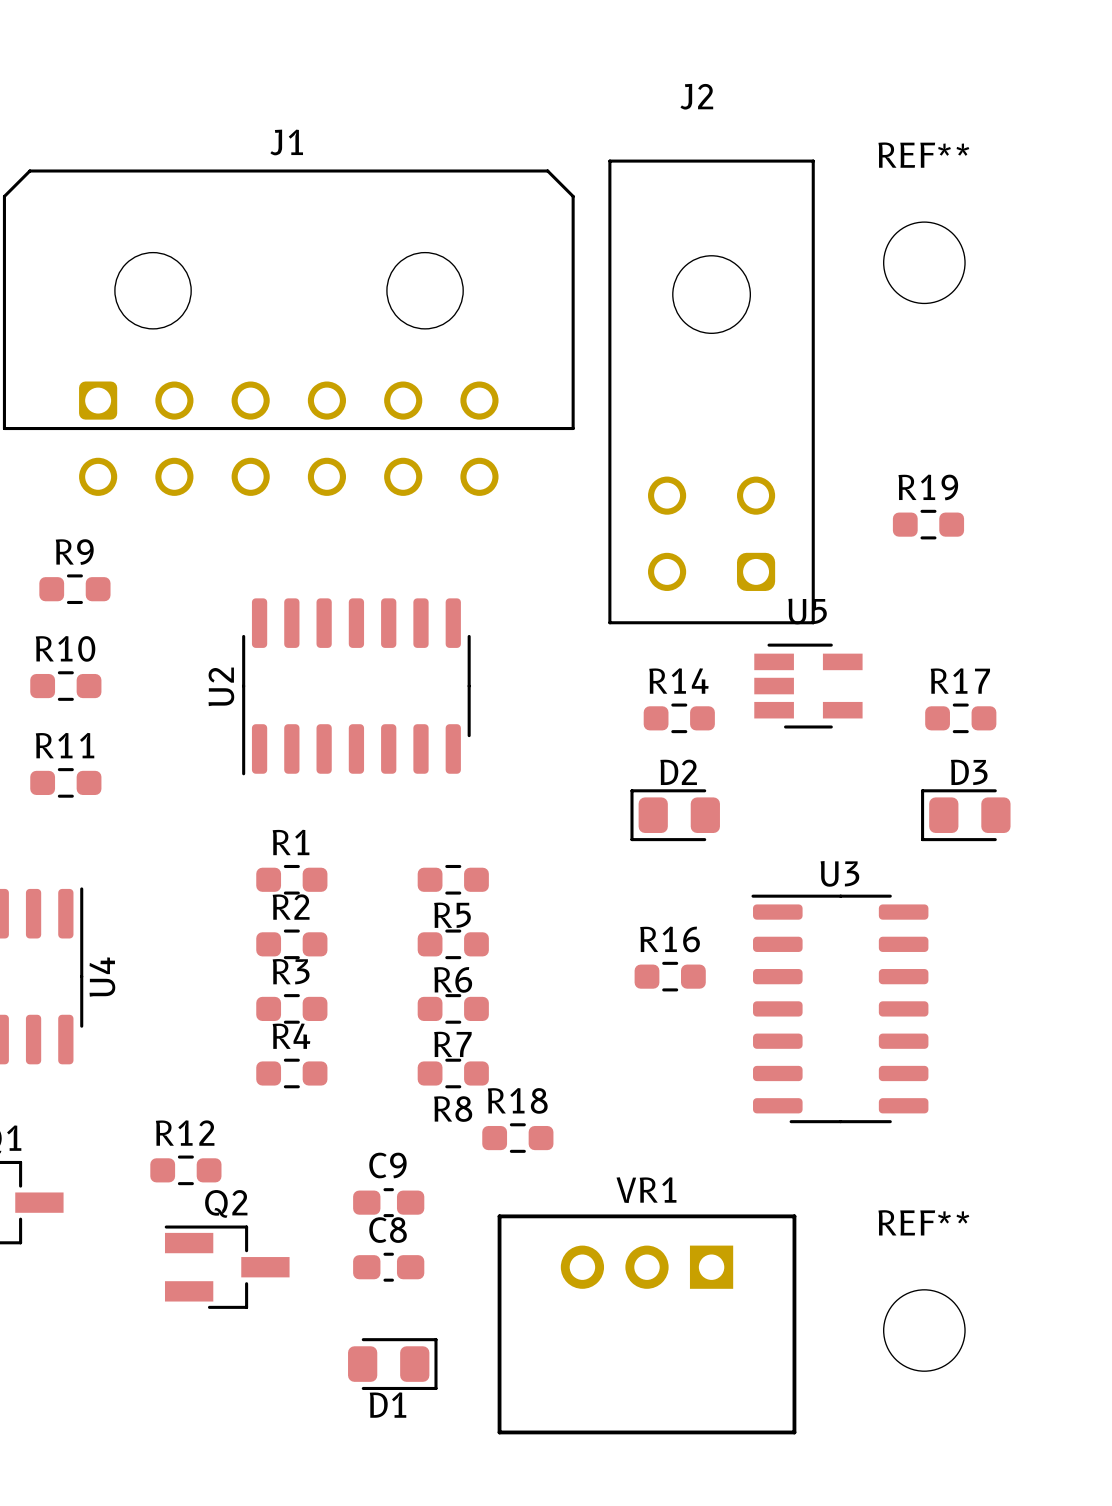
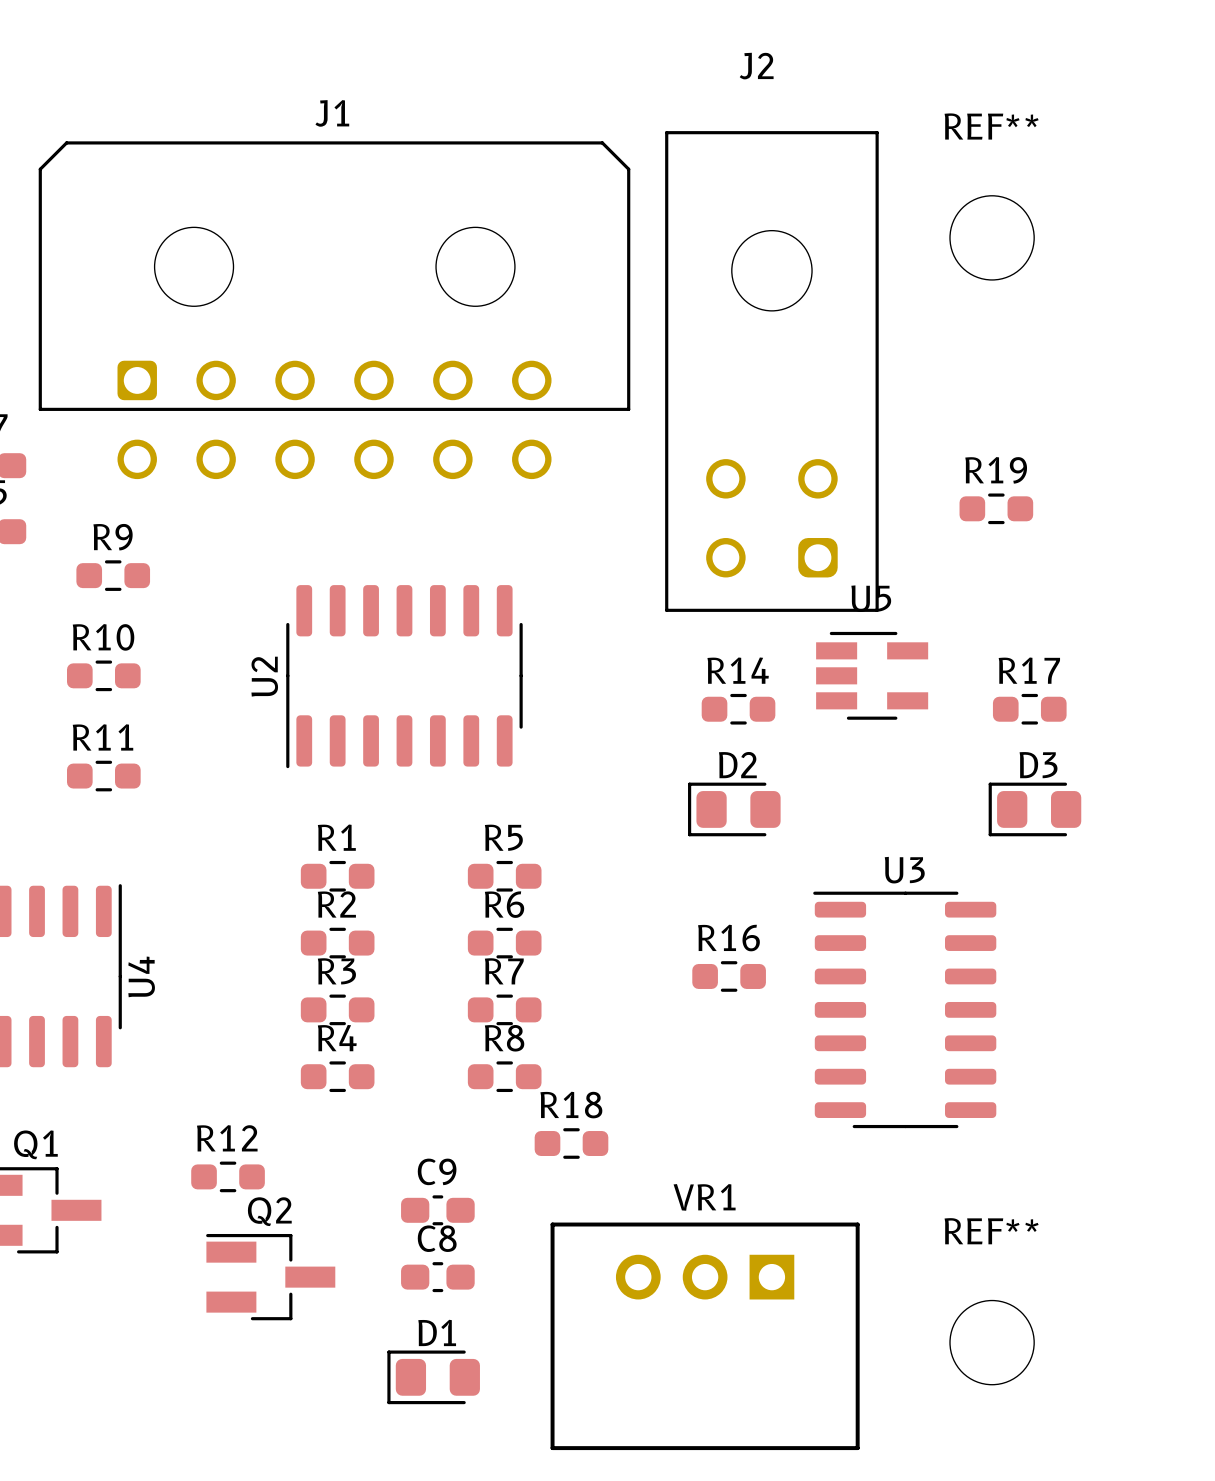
R5 name position: R5 (452, 915) -> R5 (503, 837)
R6 name position: R6 (453, 979) -> R6 (504, 904)
R7 name position: R7 (452, 1044) -> R7 (504, 971)
R8 name position: R8 (453, 1109) -> R8 (504, 1038)
D1 rotation: 0° (392, 1364) -> 180° (433, 1377)

